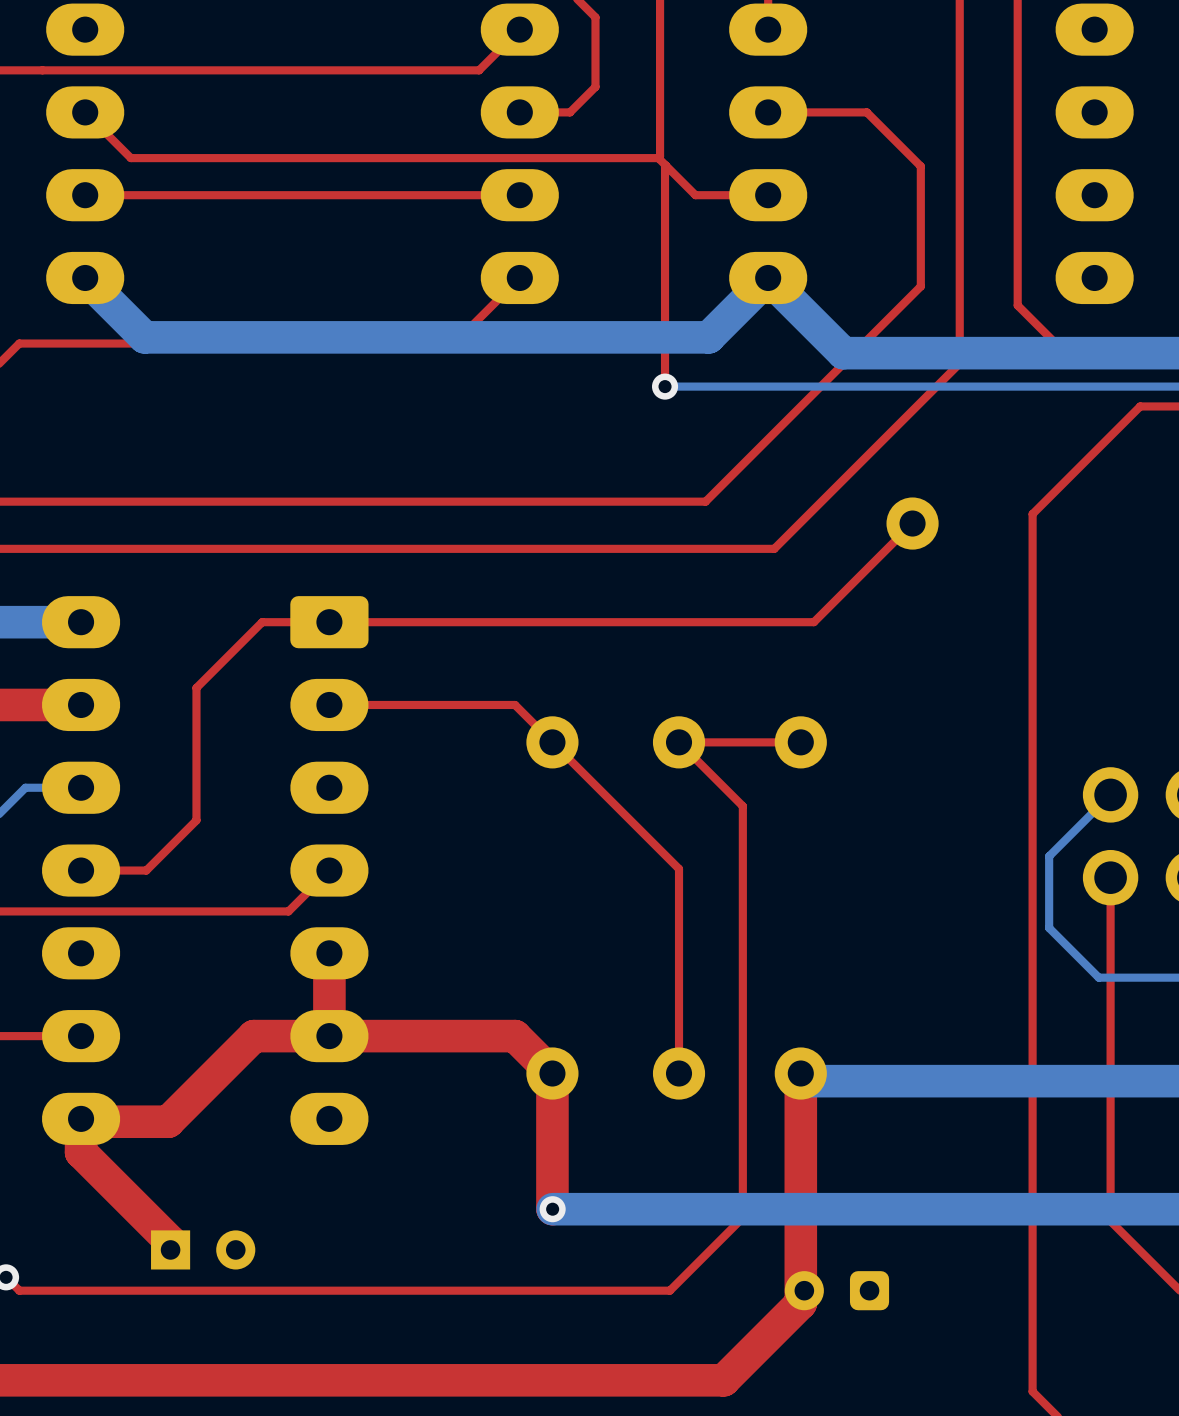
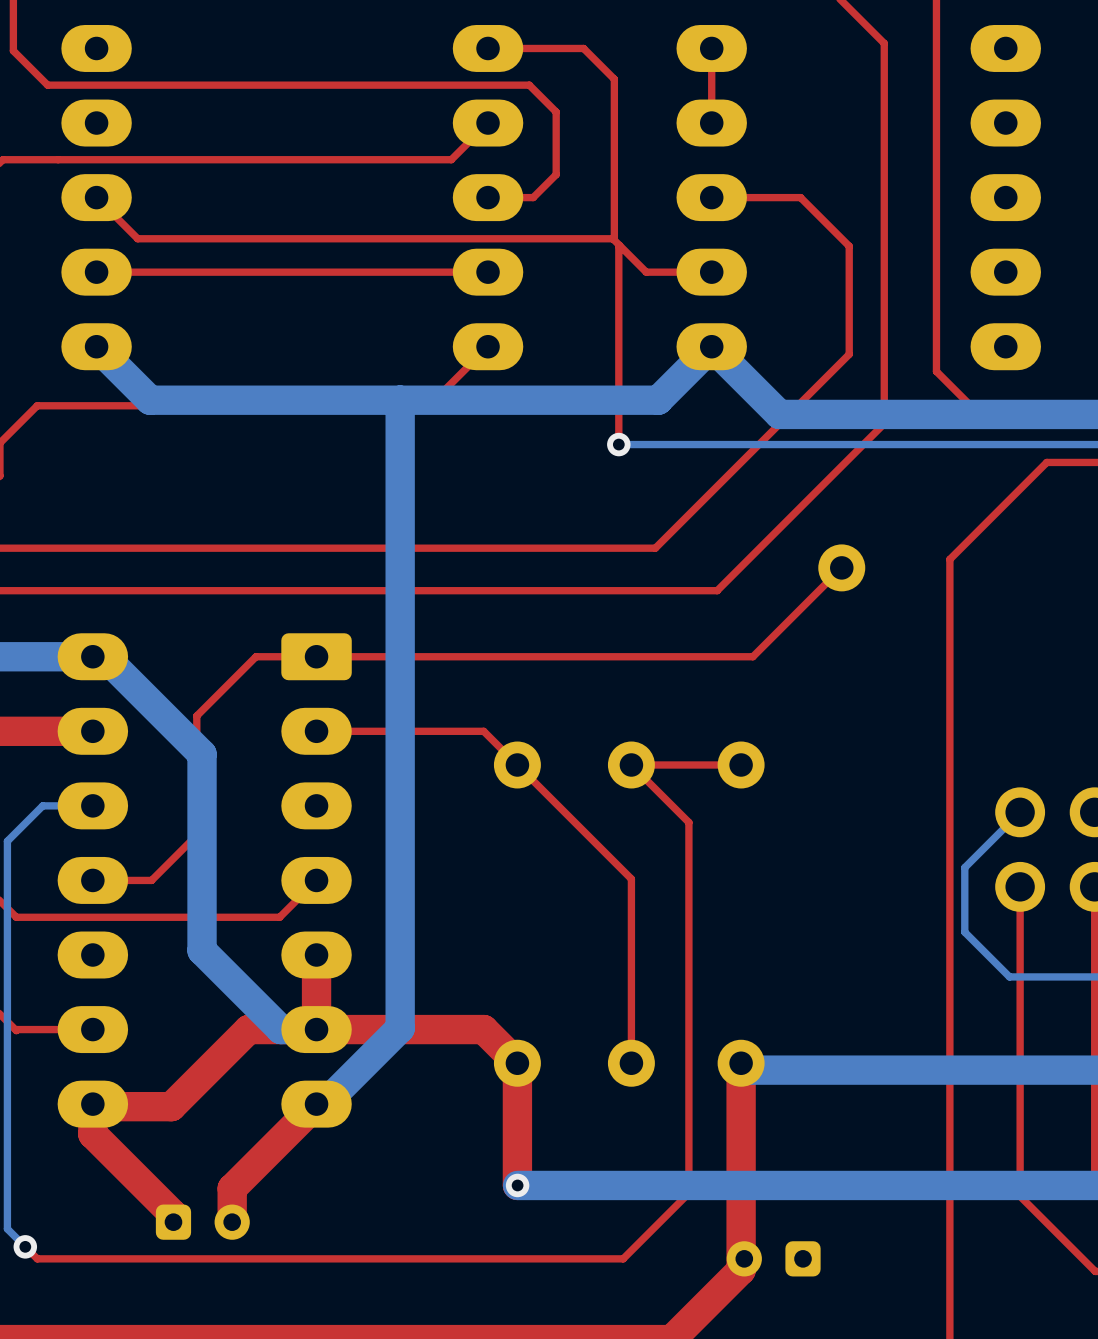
bottom track: none -> (400, 400) (400, 1028) (324, 1104) (316, 1104)
bottom track: none -> (92, 656) (104, 656) (202, 754) (202, 950) (280, 1029) (316, 1029)
top track: none -> (316, 1104) (232, 1188) (232, 1222)
part footprint: [151, 1230, 256, 1270] -> [155, 1204, 250, 1240]

